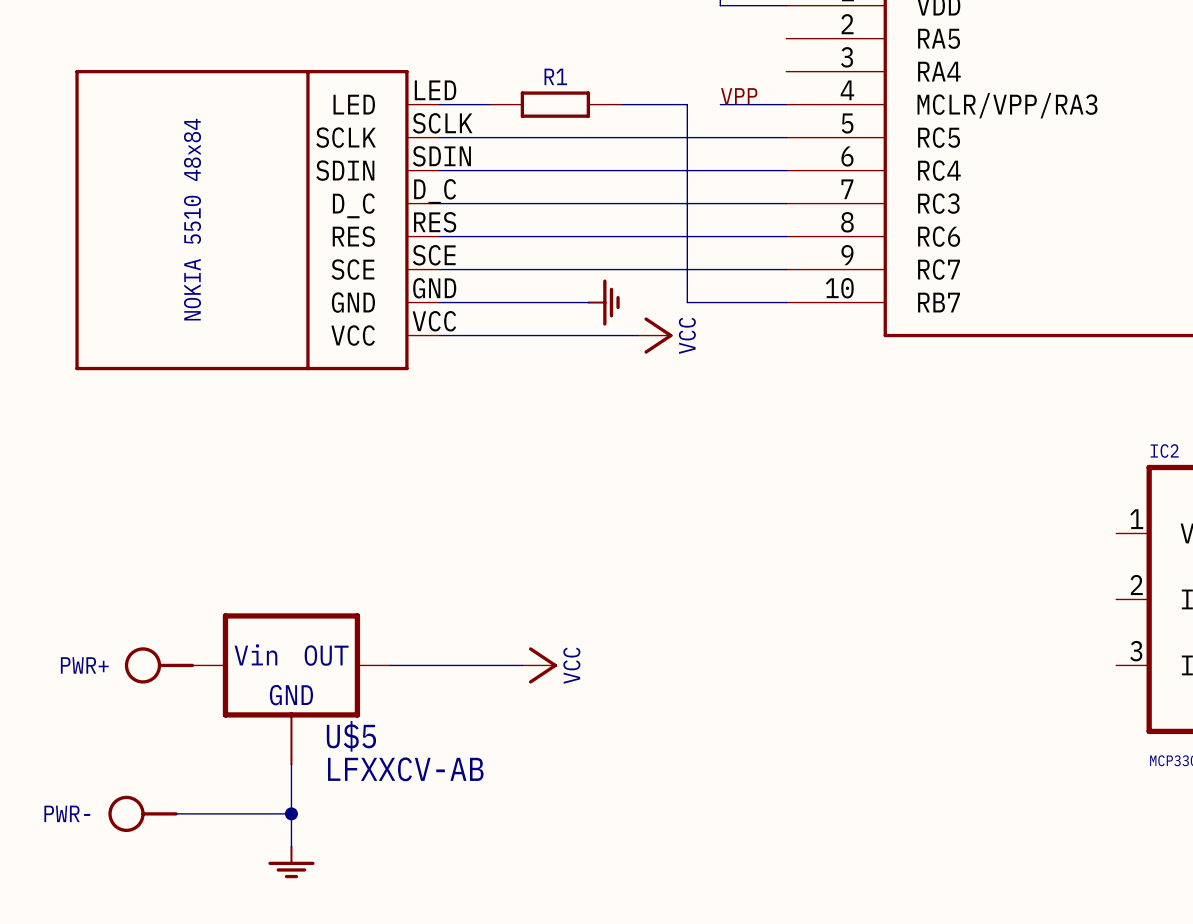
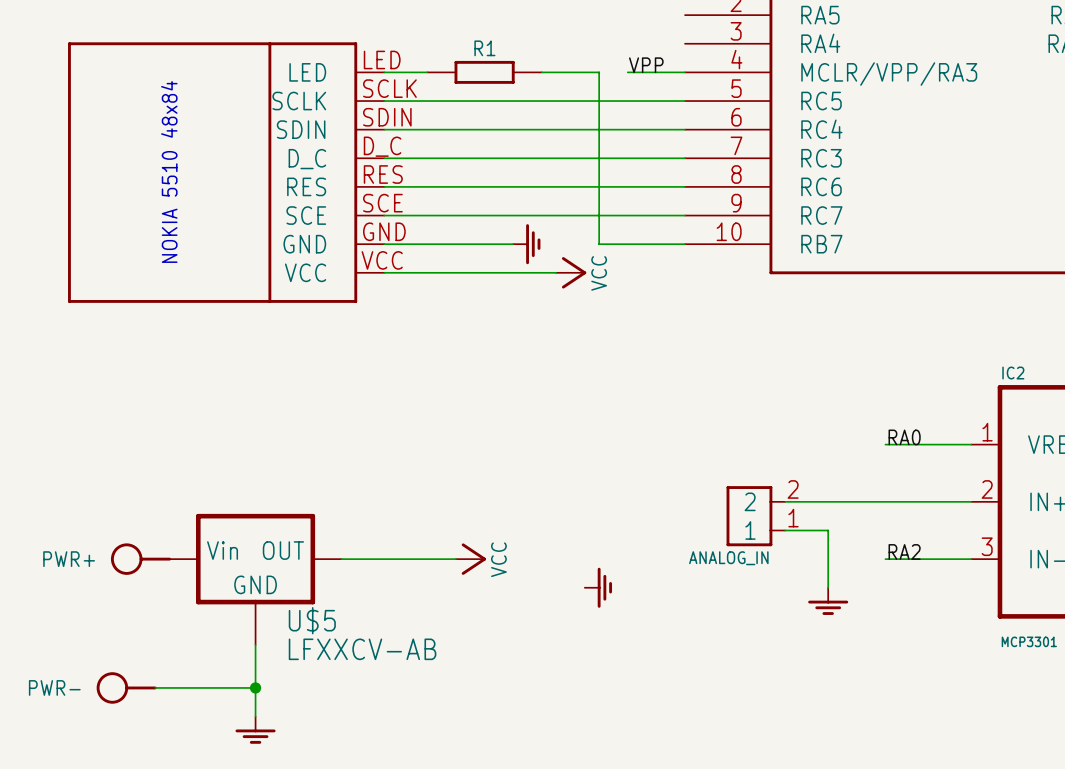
label: none -> RA0 (904, 437)
wire: none -> (885, 444) (971, 444)
wire: none -> (785, 501) (971, 501)
ANALOG_IN: none -> (756, 516)
wire: none -> (785, 530) (828, 530) (828, 587)
label: none -> RA2 (904, 551)
wire: none -> (885, 559) (971, 559)
power symbol: none -> (597, 587)
power symbol: none -> (828, 600)

